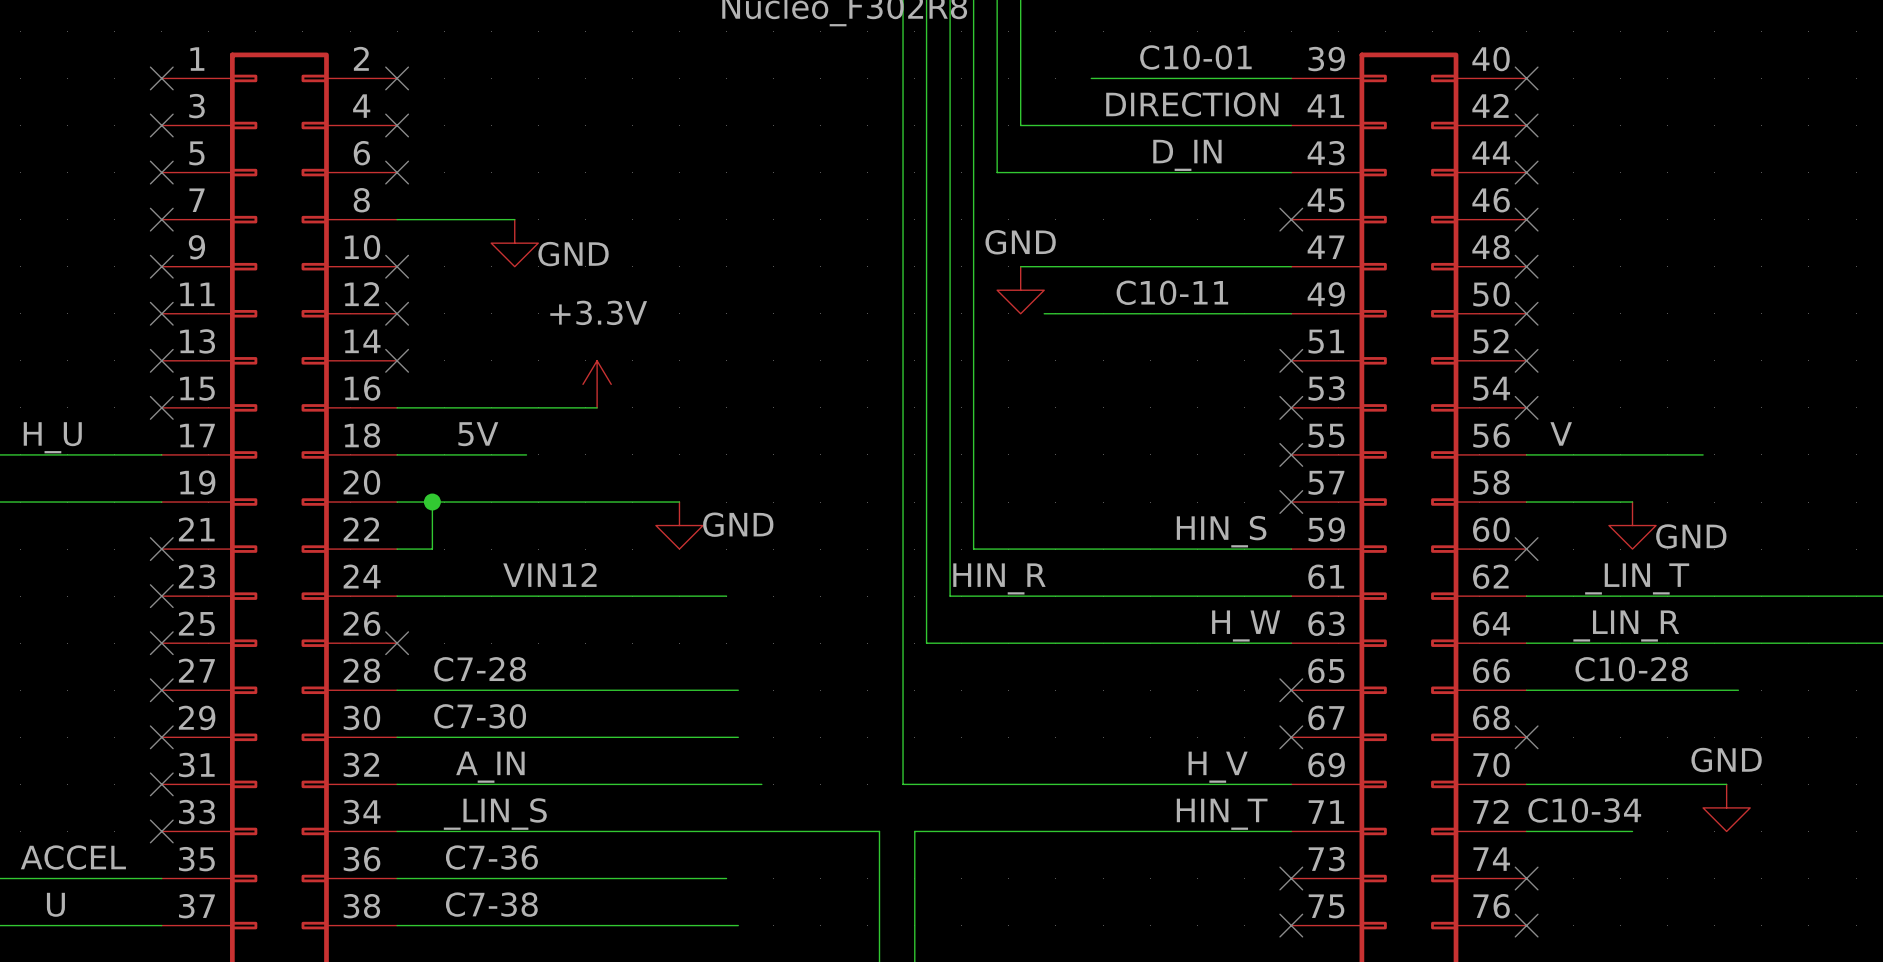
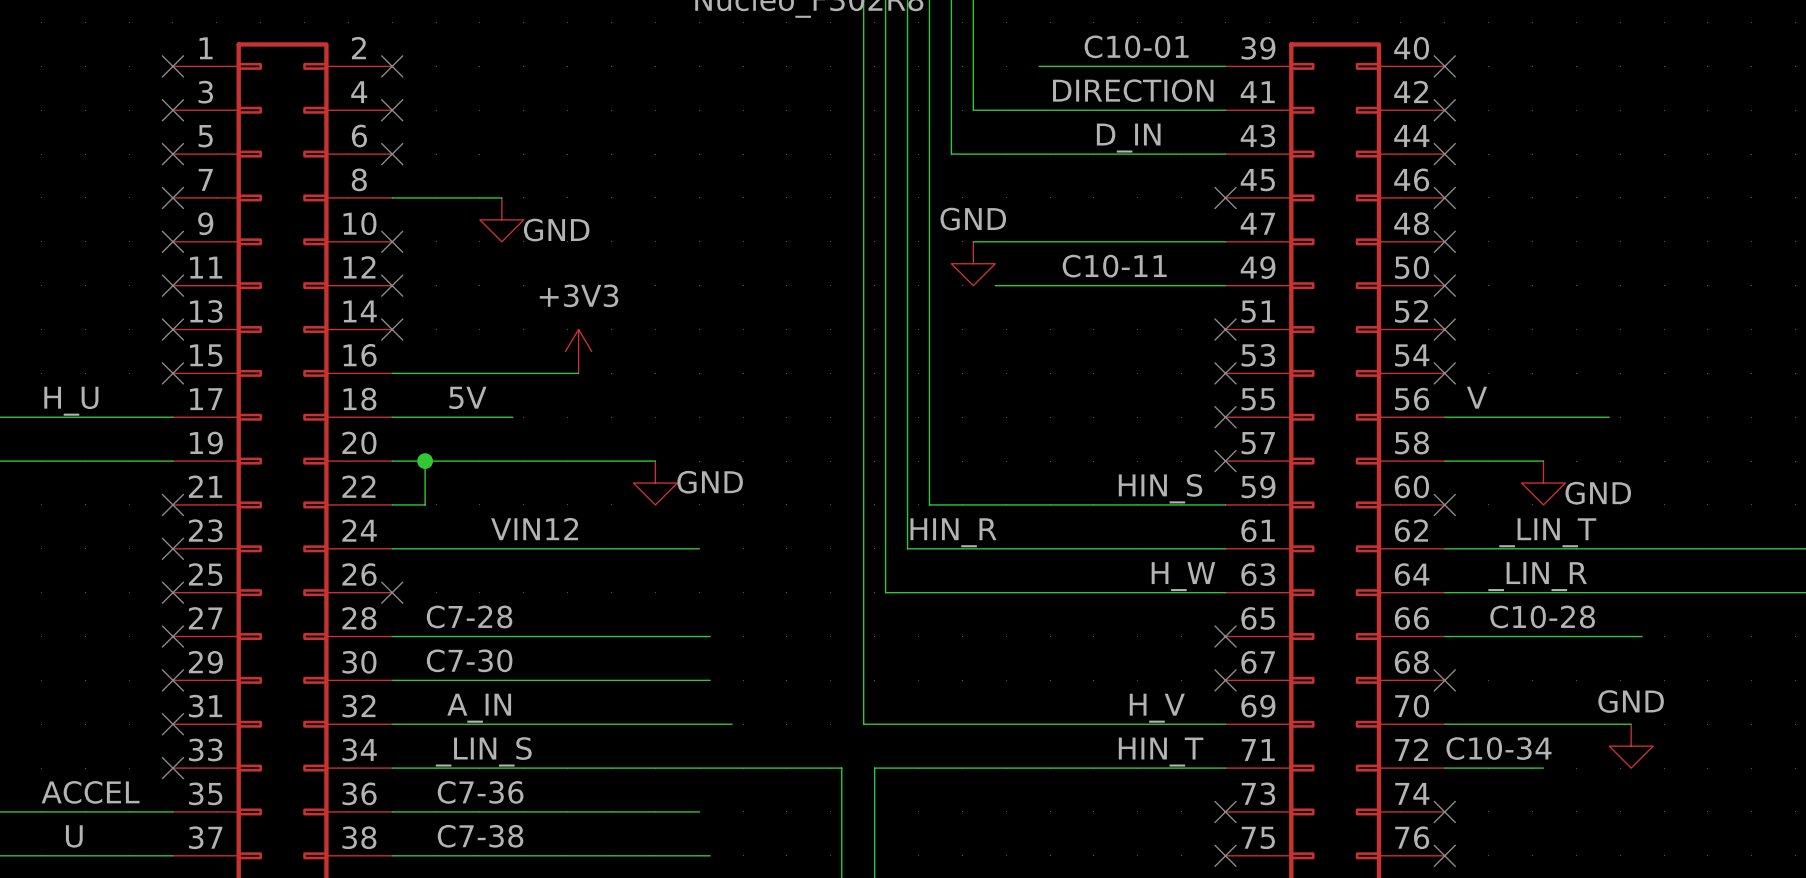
power symbol: +3.3V (597, 384) -> +3V3 (578, 351)

